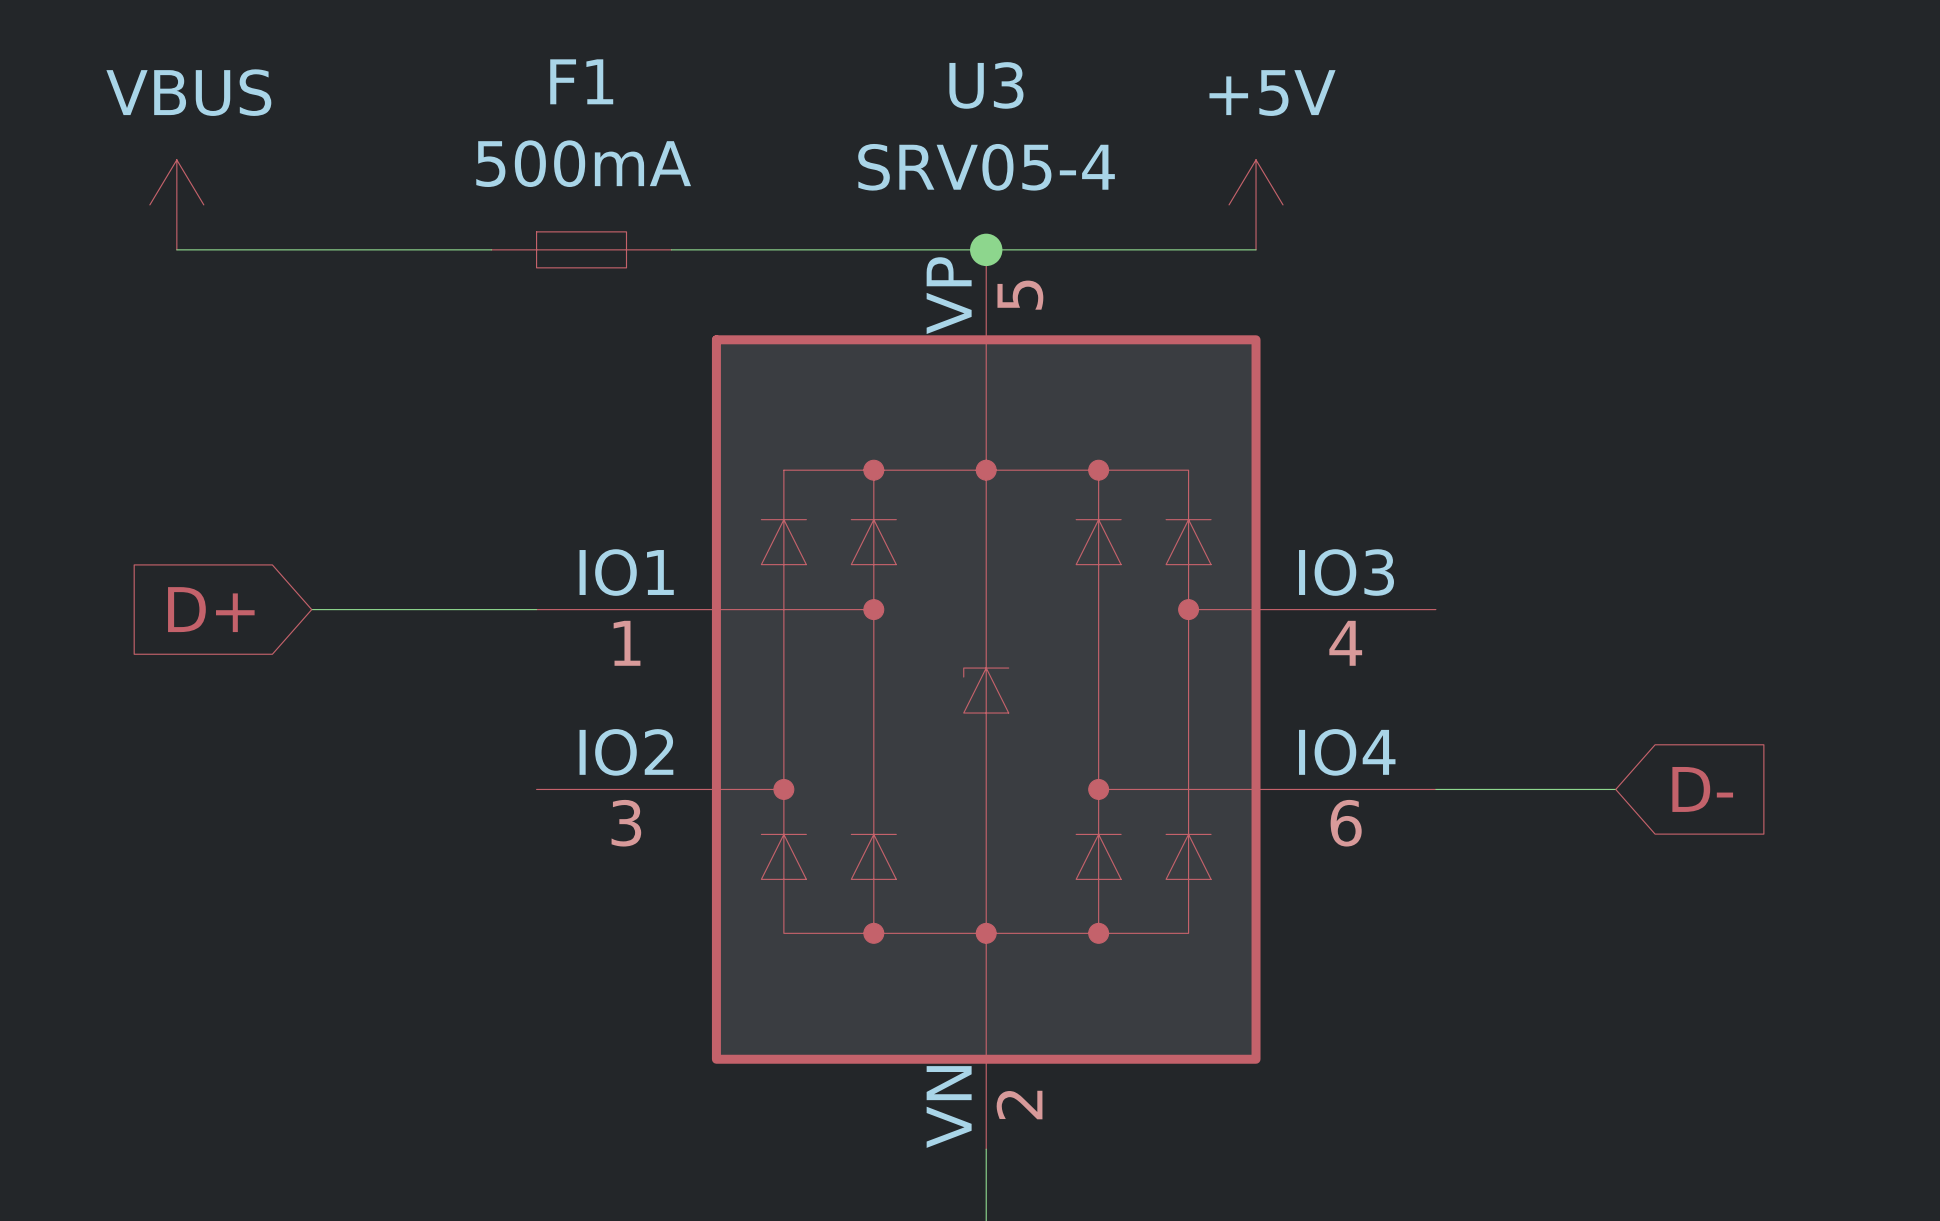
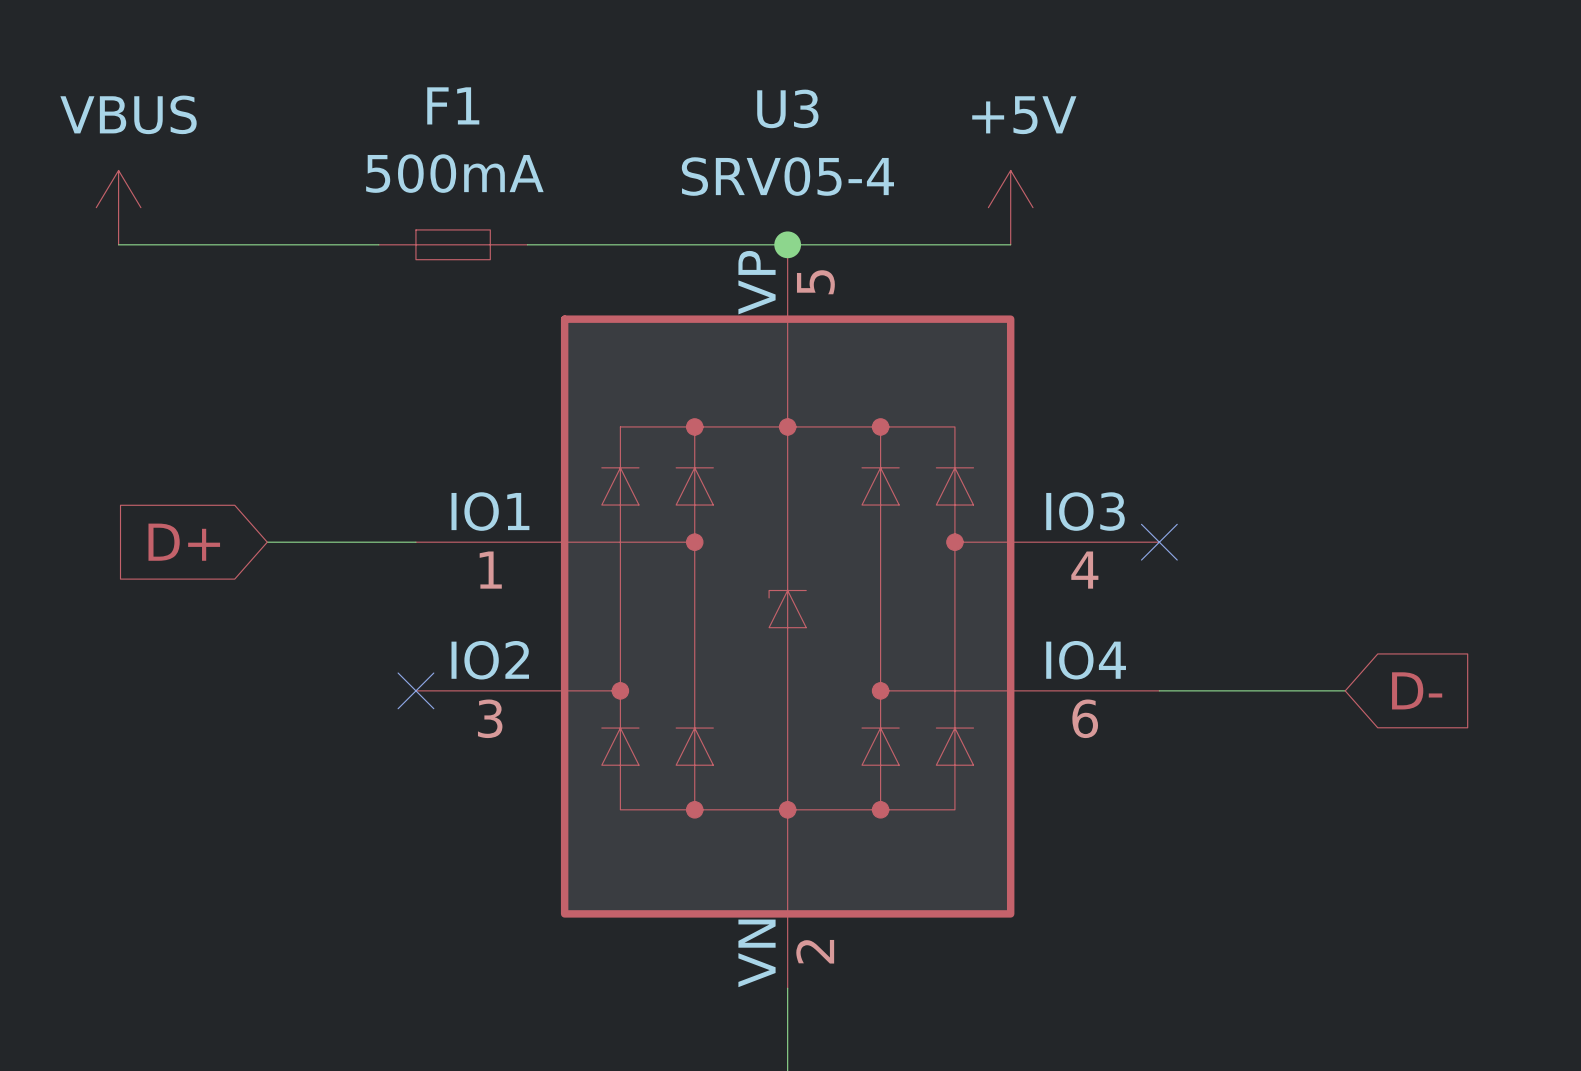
global label position: D+ (211, 609) -> D+ (184, 542)
wire: (311, 609) (356, 609) -> none
no-connect mark: none -> (1159, 542)
no-connect mark: none -> (415, 690)
wire: none -> (1308, 690) (1345, 690)
global label position: D- (1702, 789) -> D- (1417, 690)

